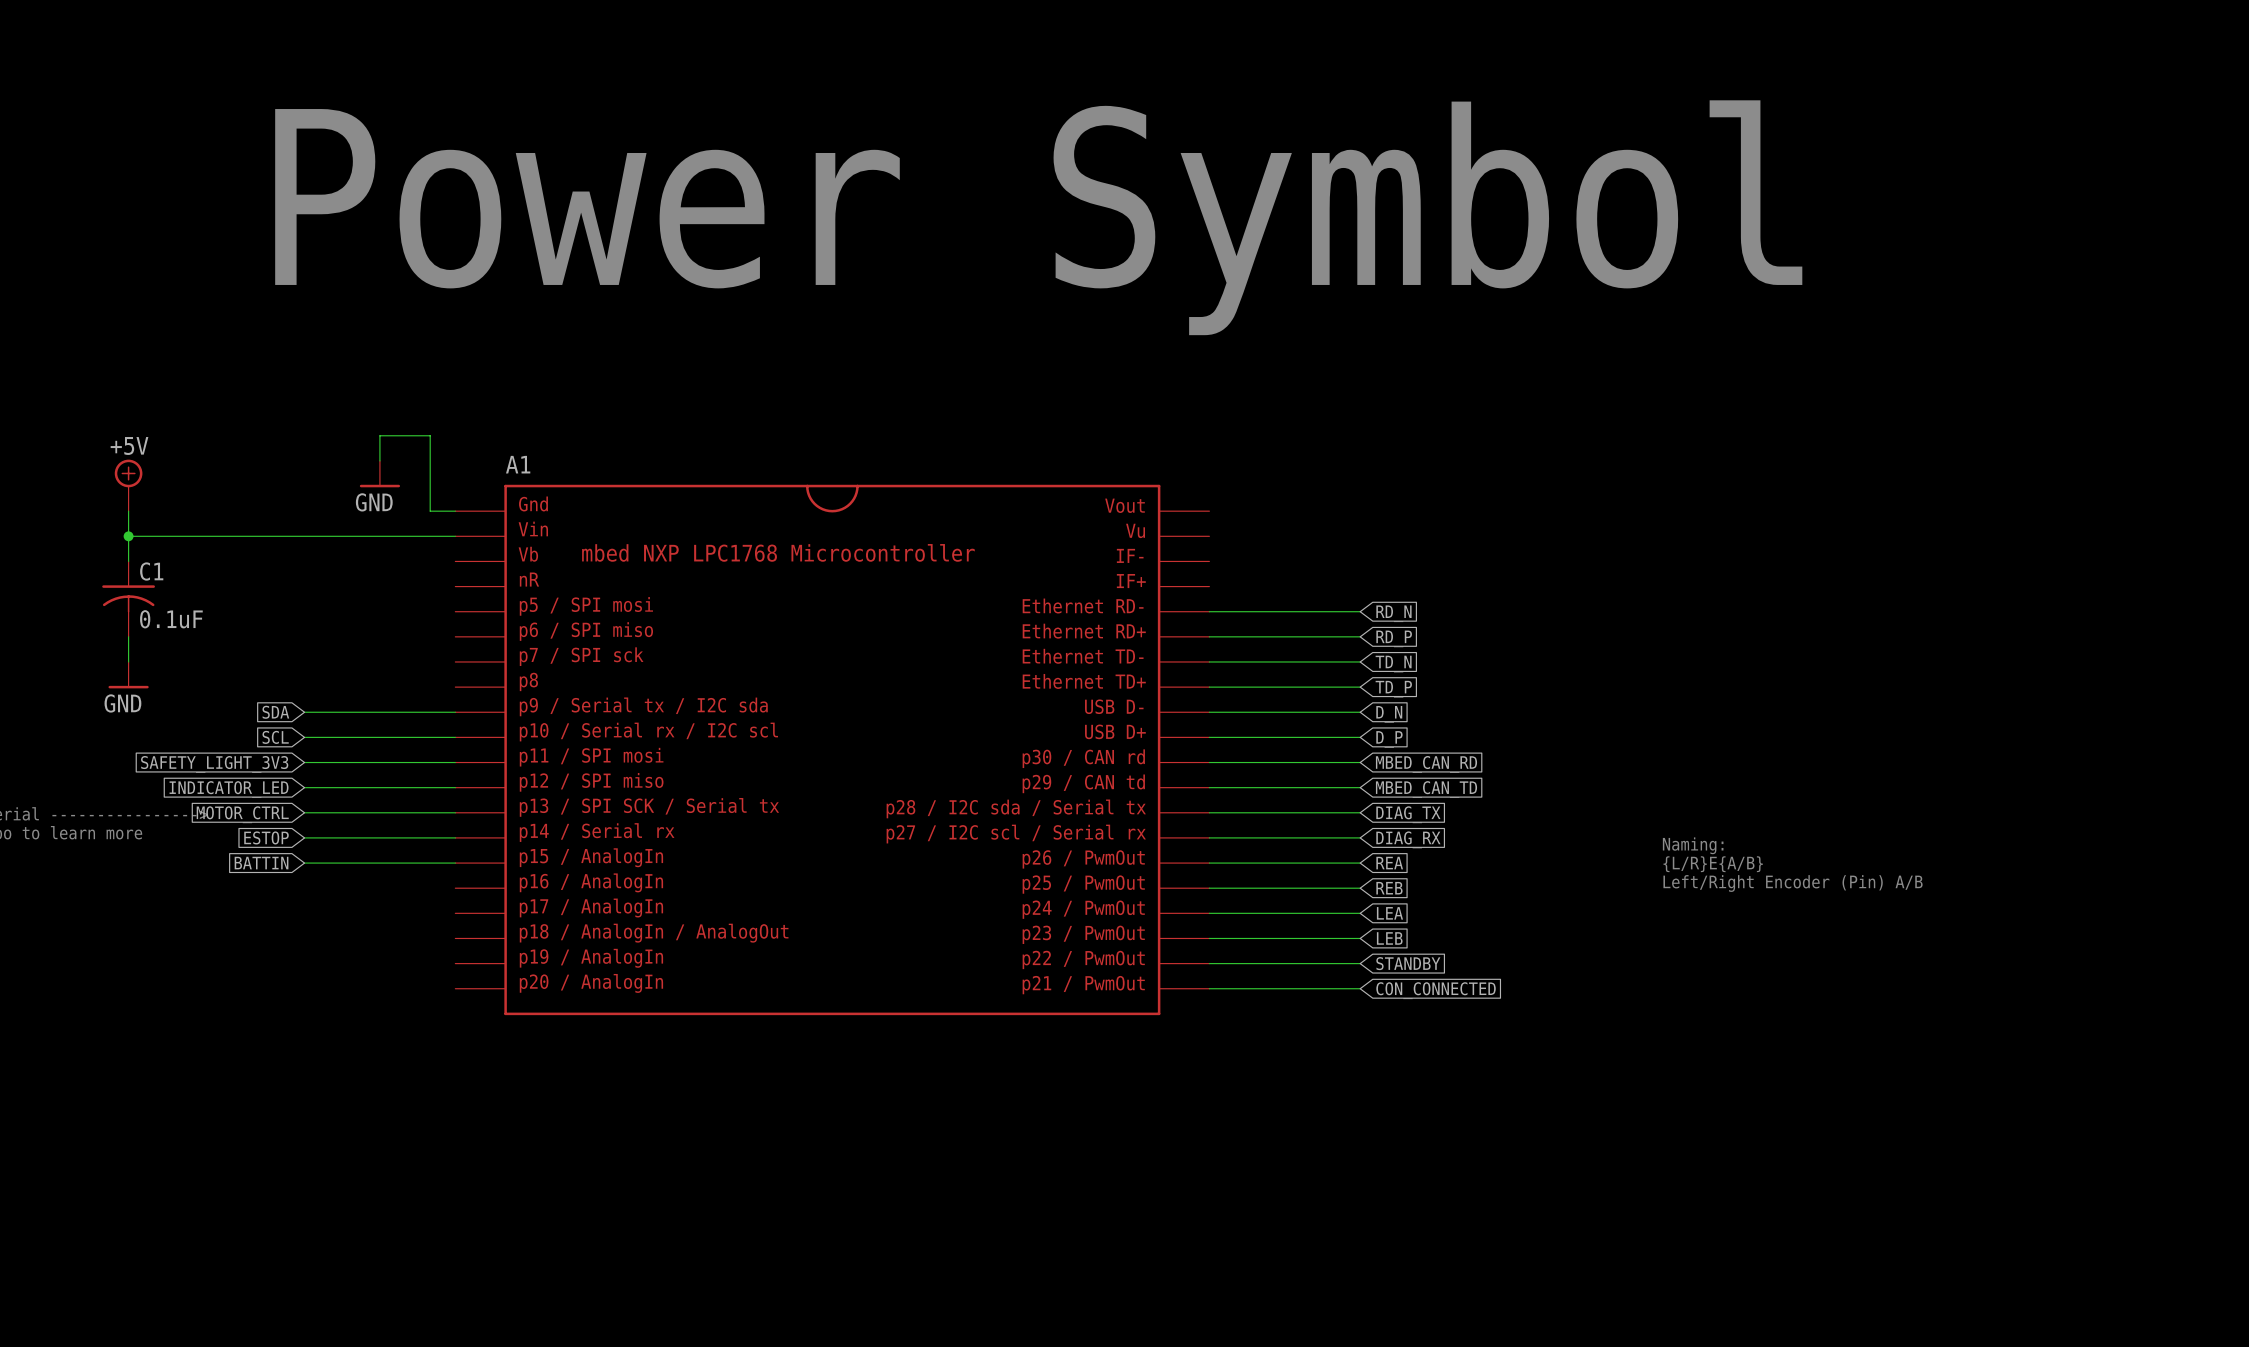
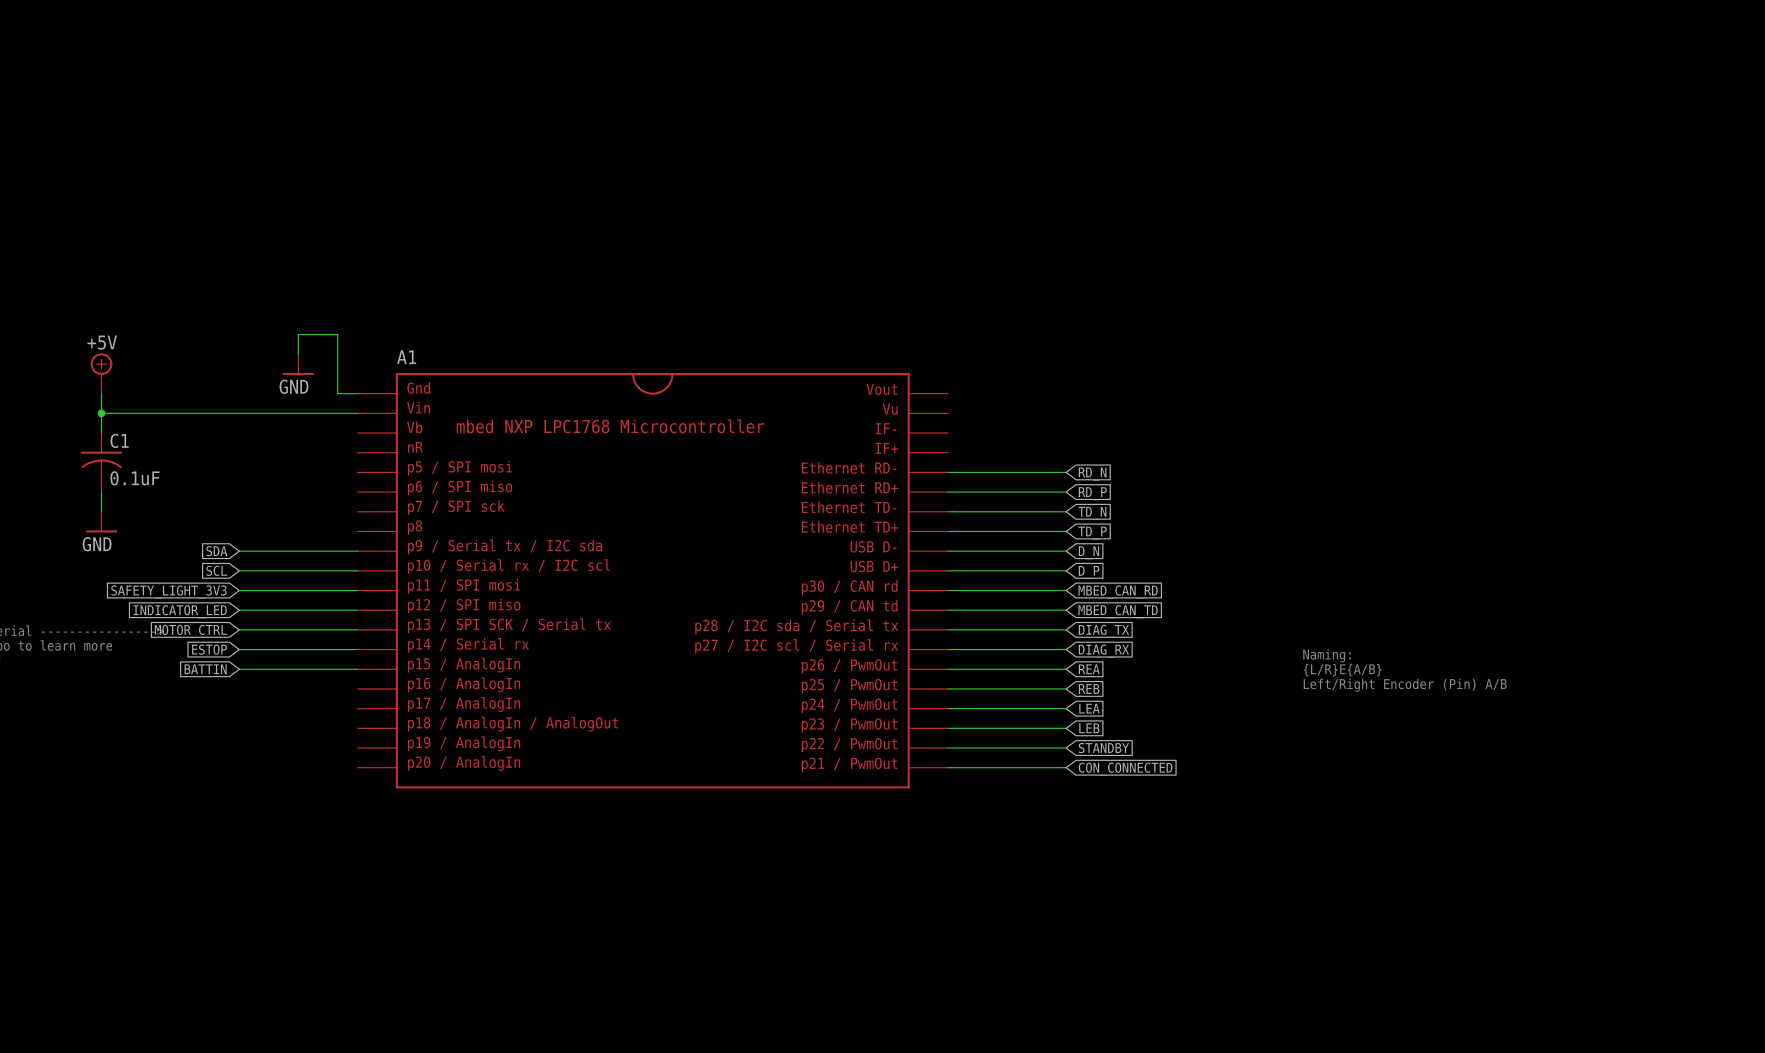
text: Power Symbol (1038, 217) -> none

